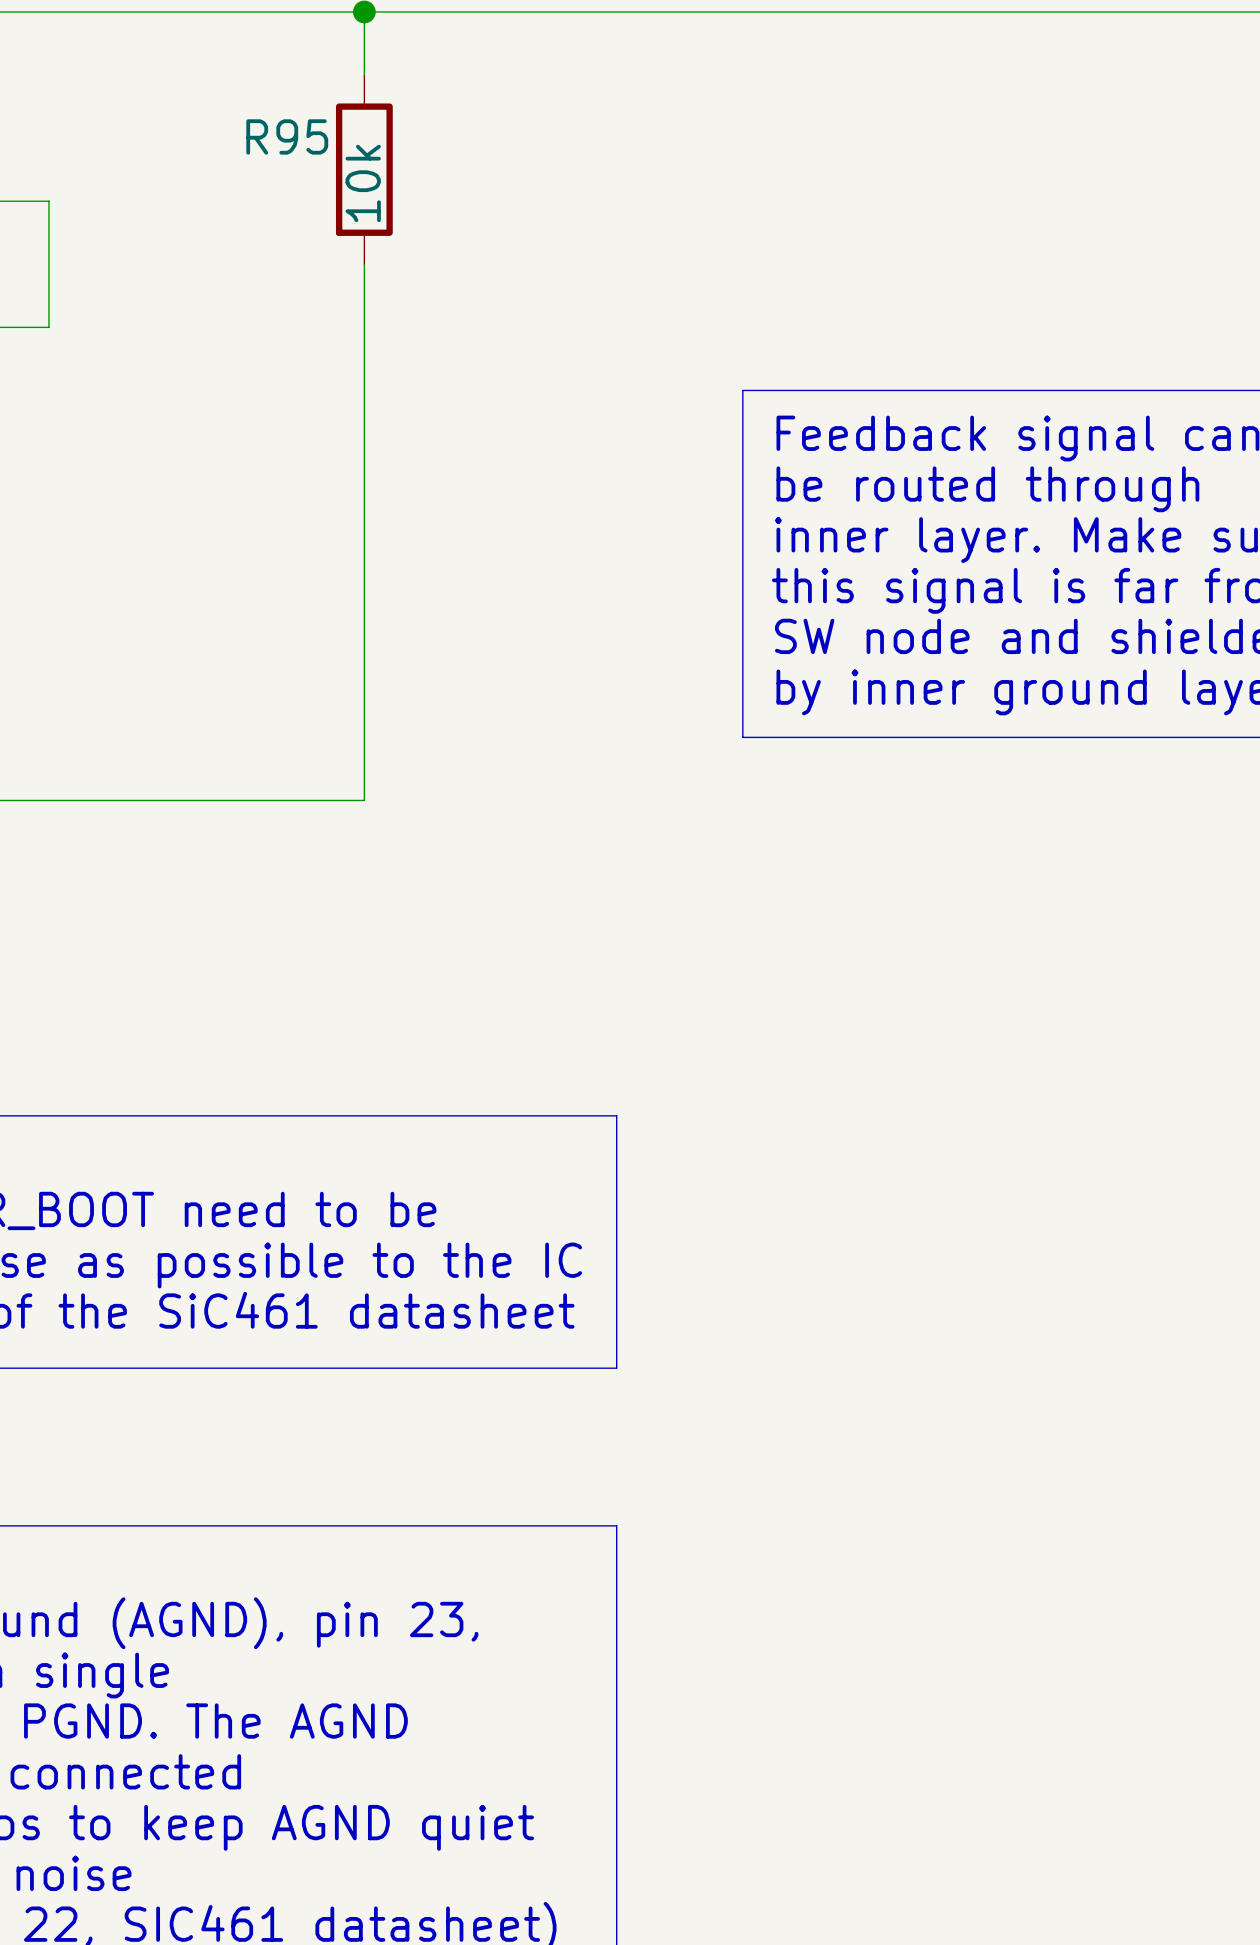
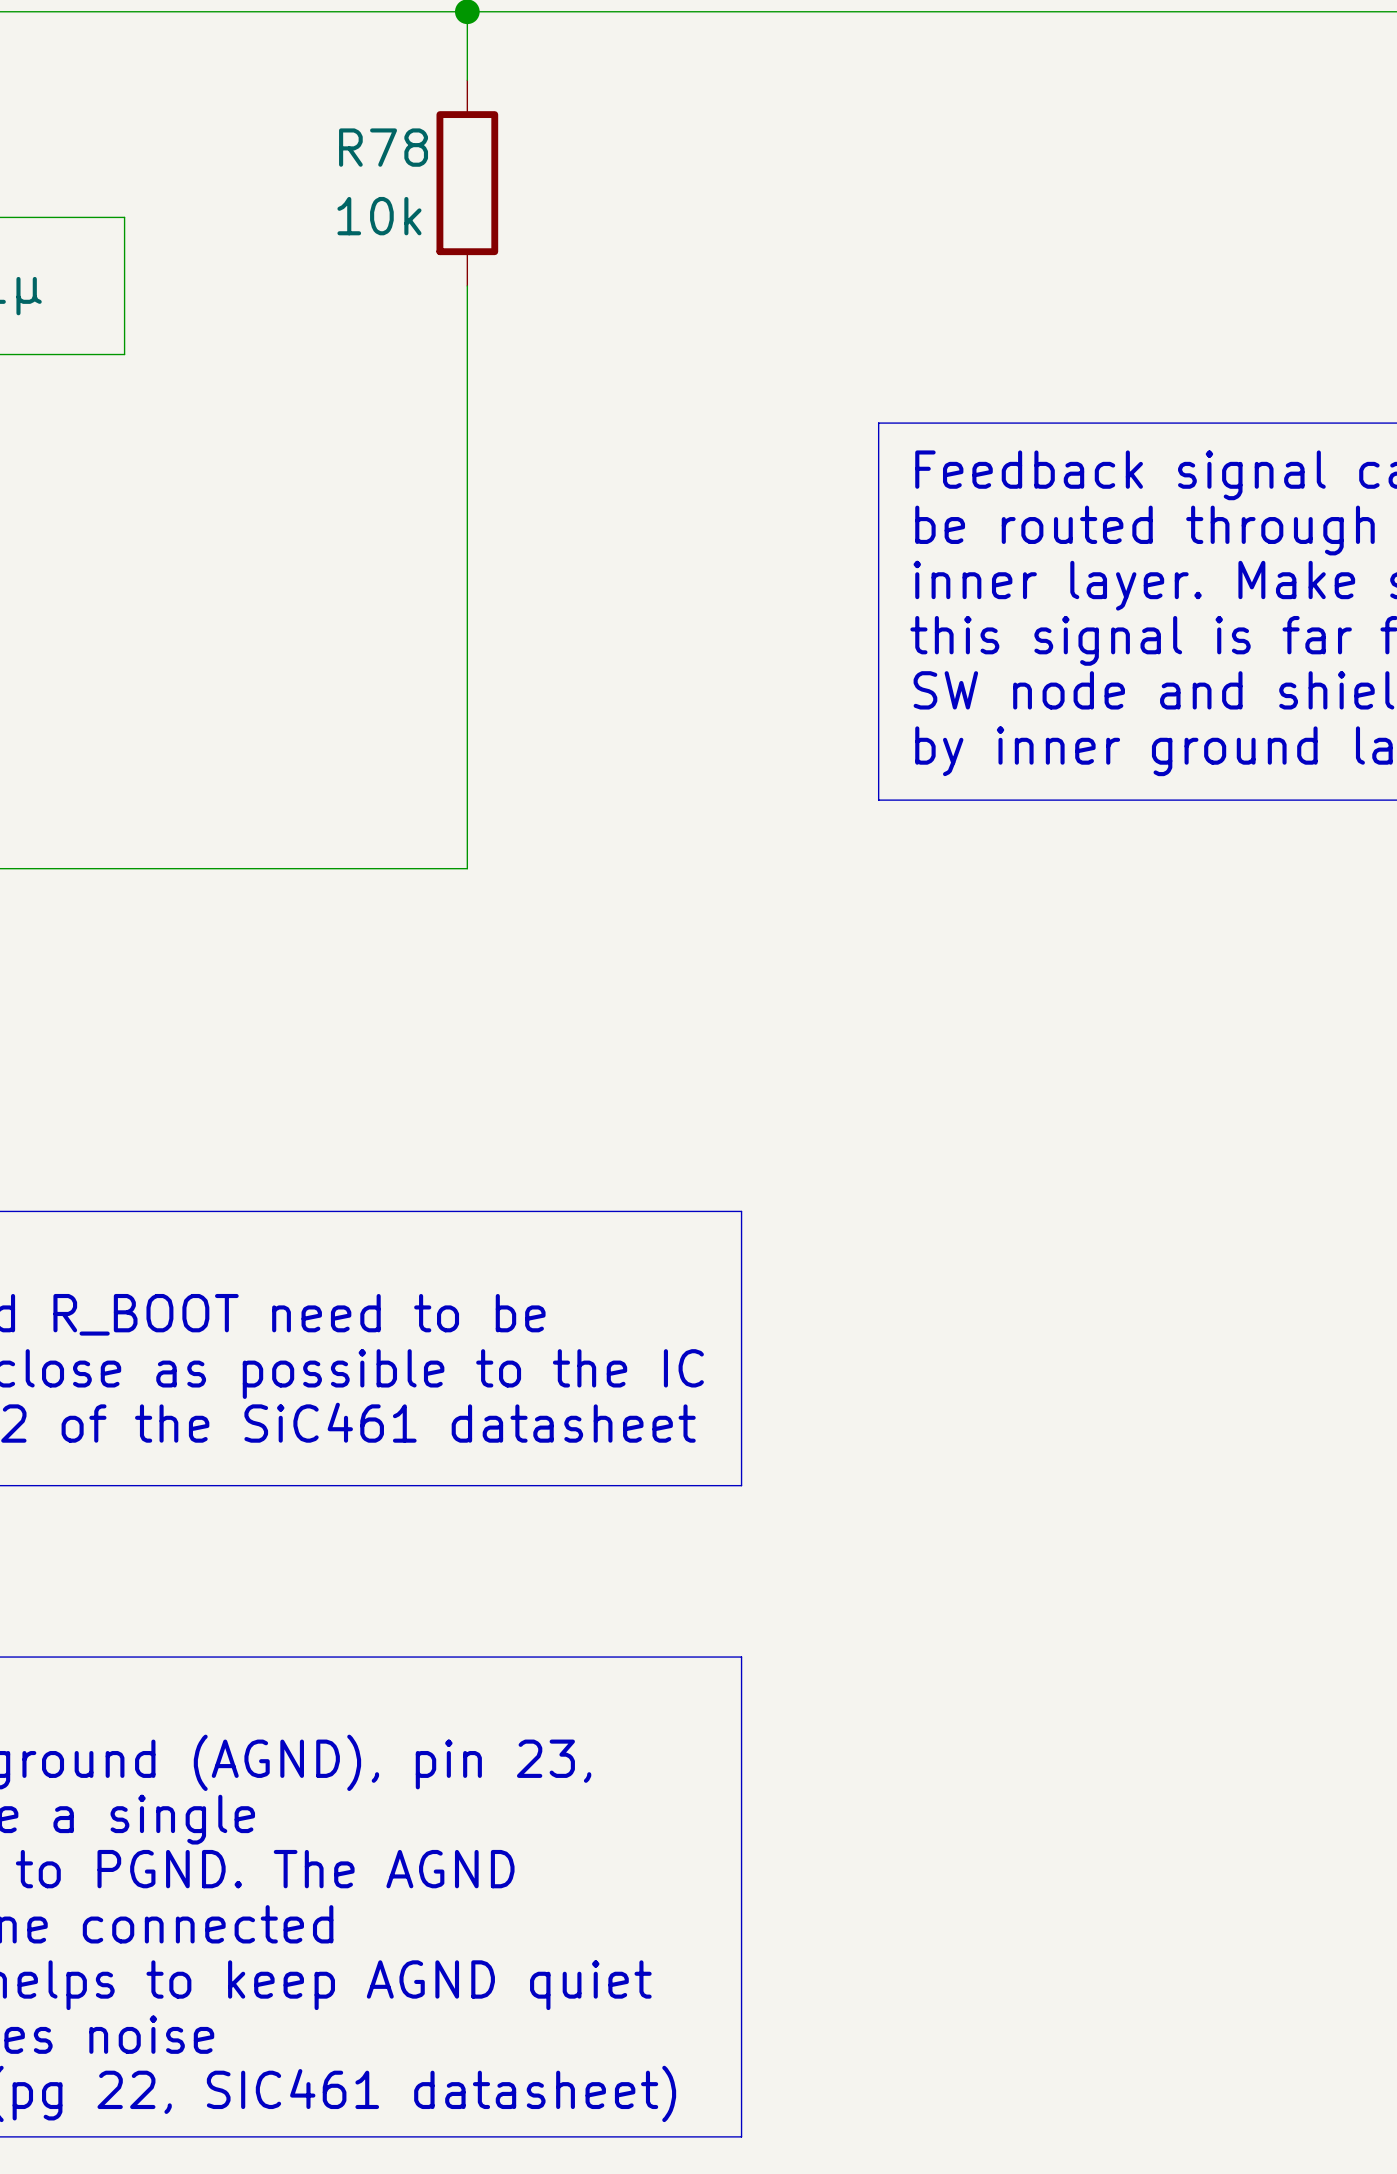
R95 name: R95 (287, 136) -> R78 (383, 147)
R95 value rotation: 0° (363, 183) -> 90° clockwise (379, 216)

